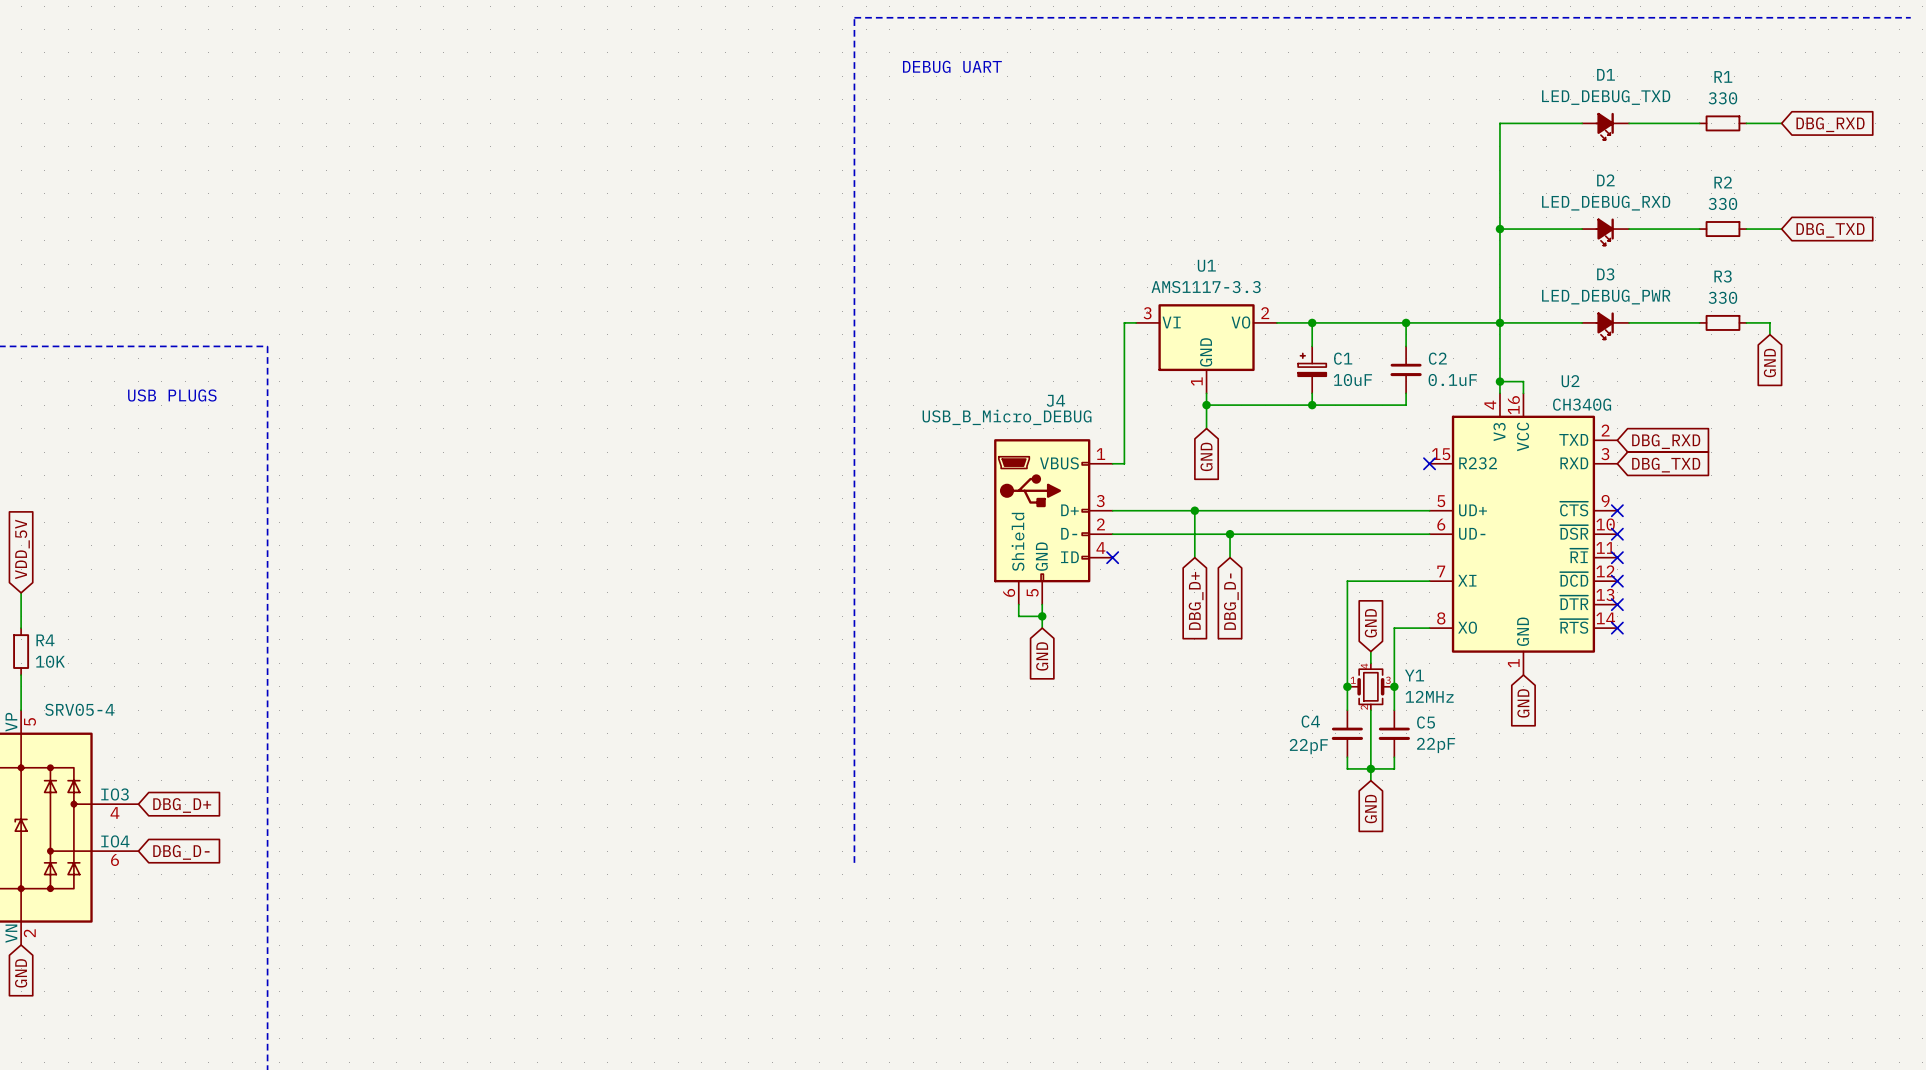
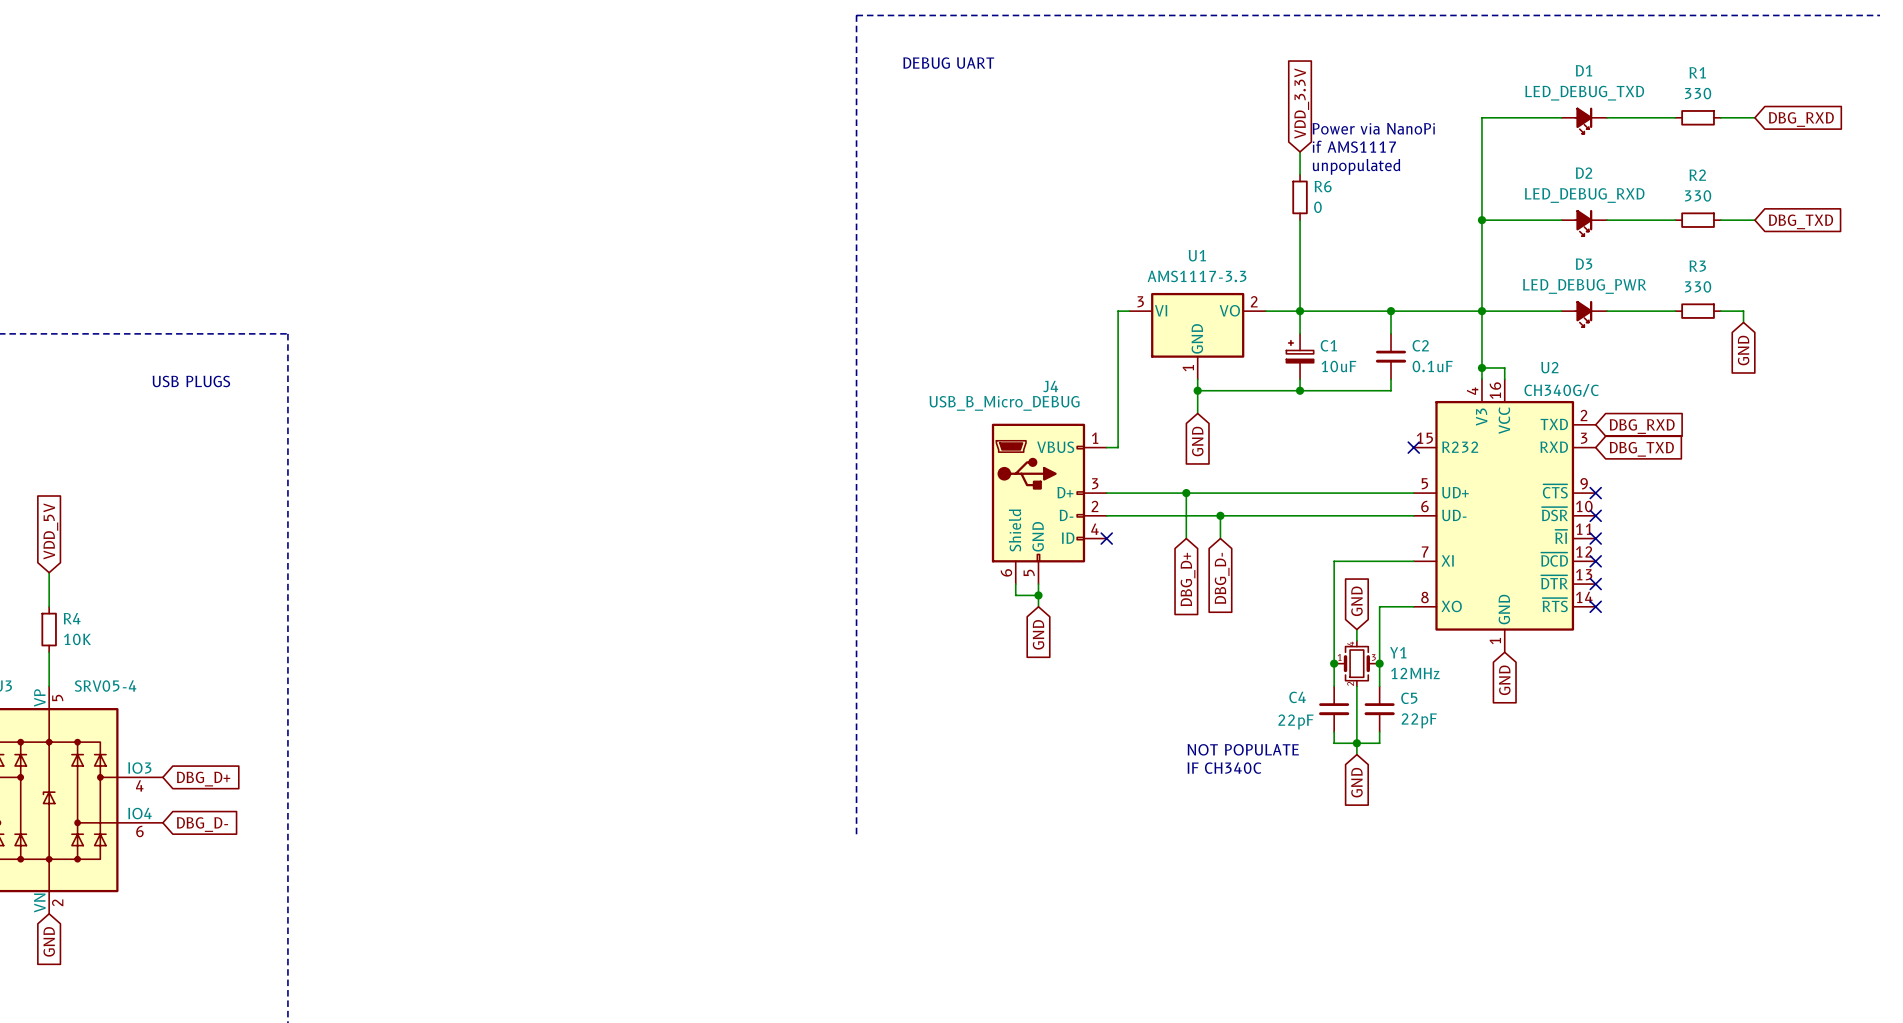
global label: none -> VDD_3.3V (1301, 103)
text: none -> Power via NanoPi (1373, 128)
text: none -> if AMS1117 (1354, 146)
wire: none -> (1300, 151) (1300, 174)
text: none -> unpopulated (1356, 166)
R6: none -> 0 (1300, 197)
wire: none -> (1300, 220) (1300, 311)
U2 value: CH340G (1582, 404) -> CH340G/C (1561, 390)
text: none -> NOT POPULATE (1243, 749)
text: none -> IF CH340C (1224, 768)

